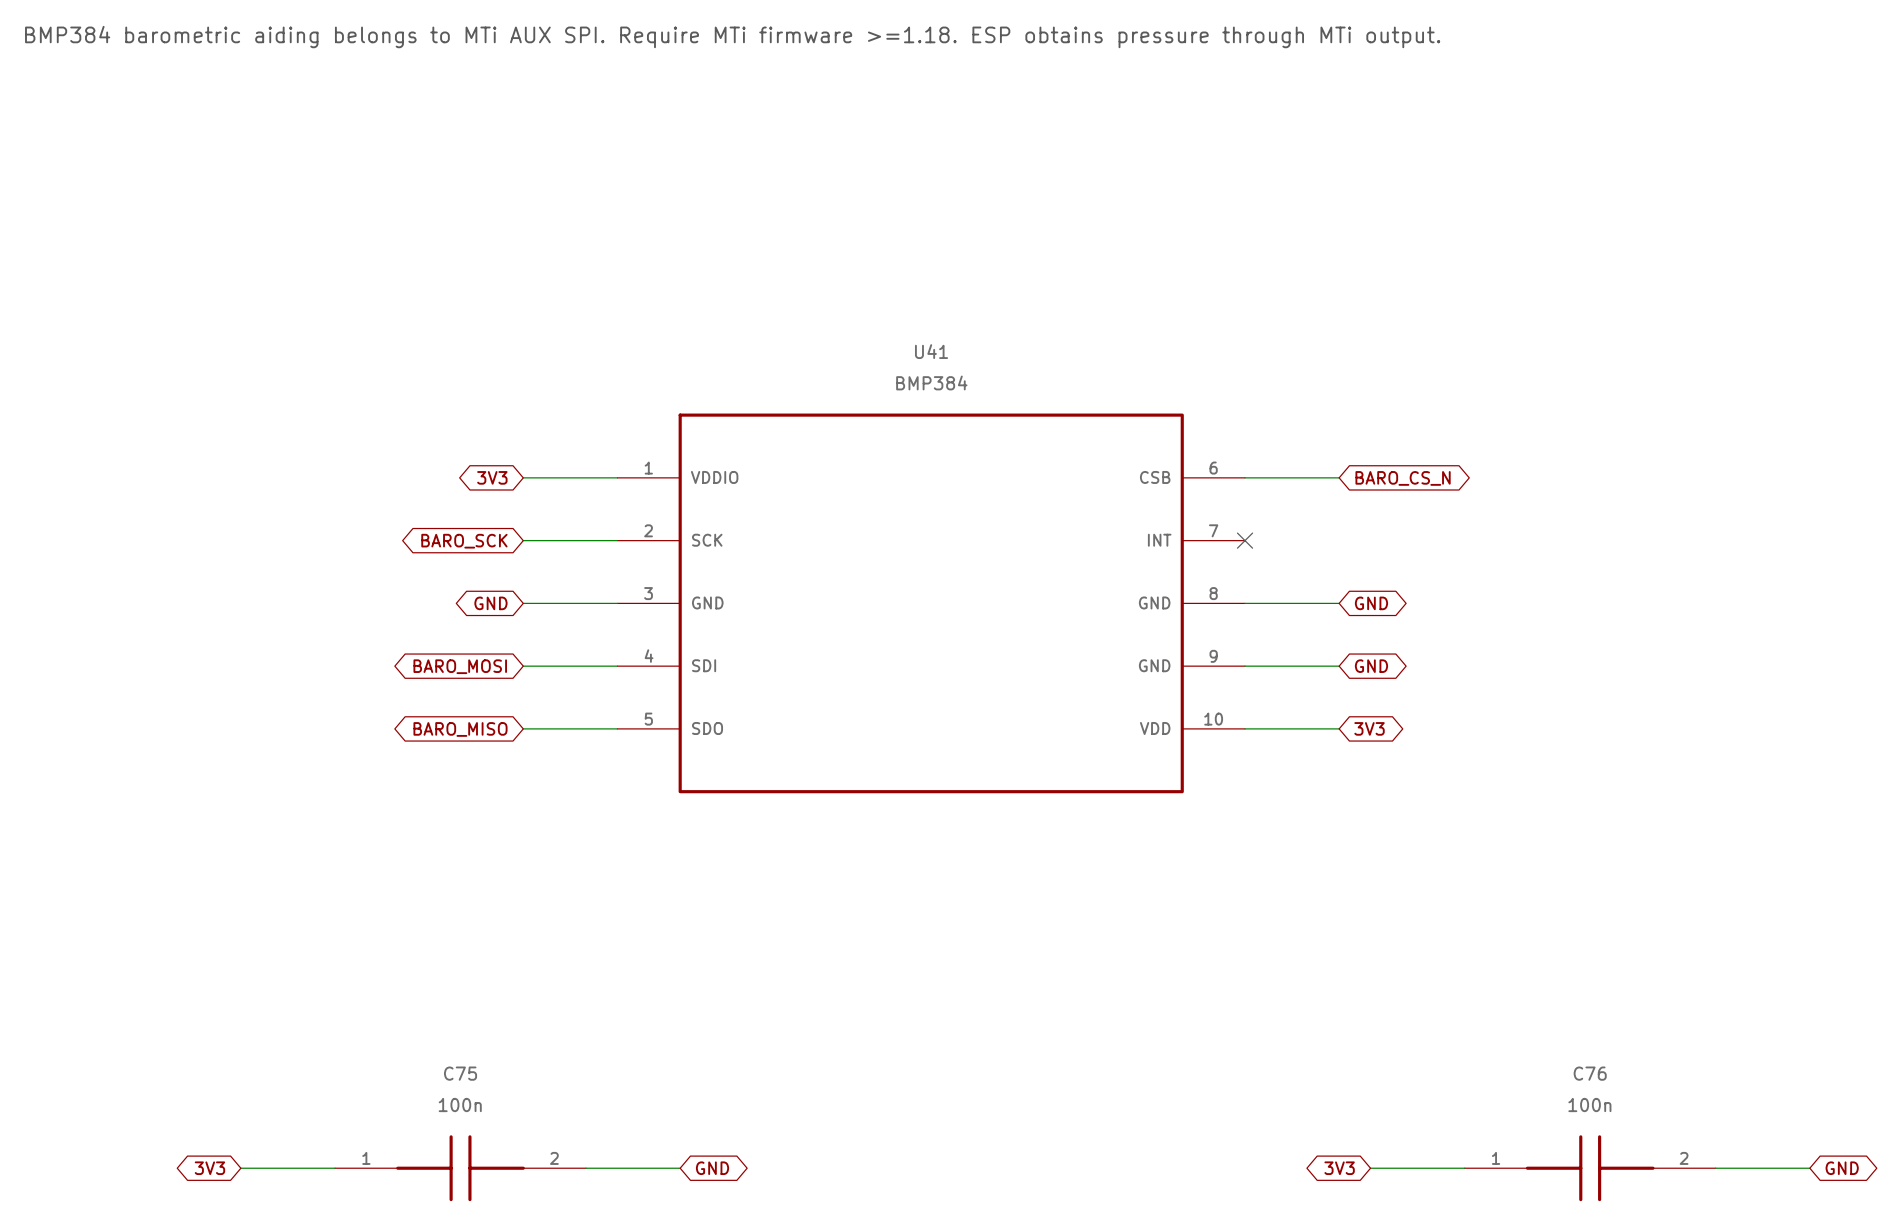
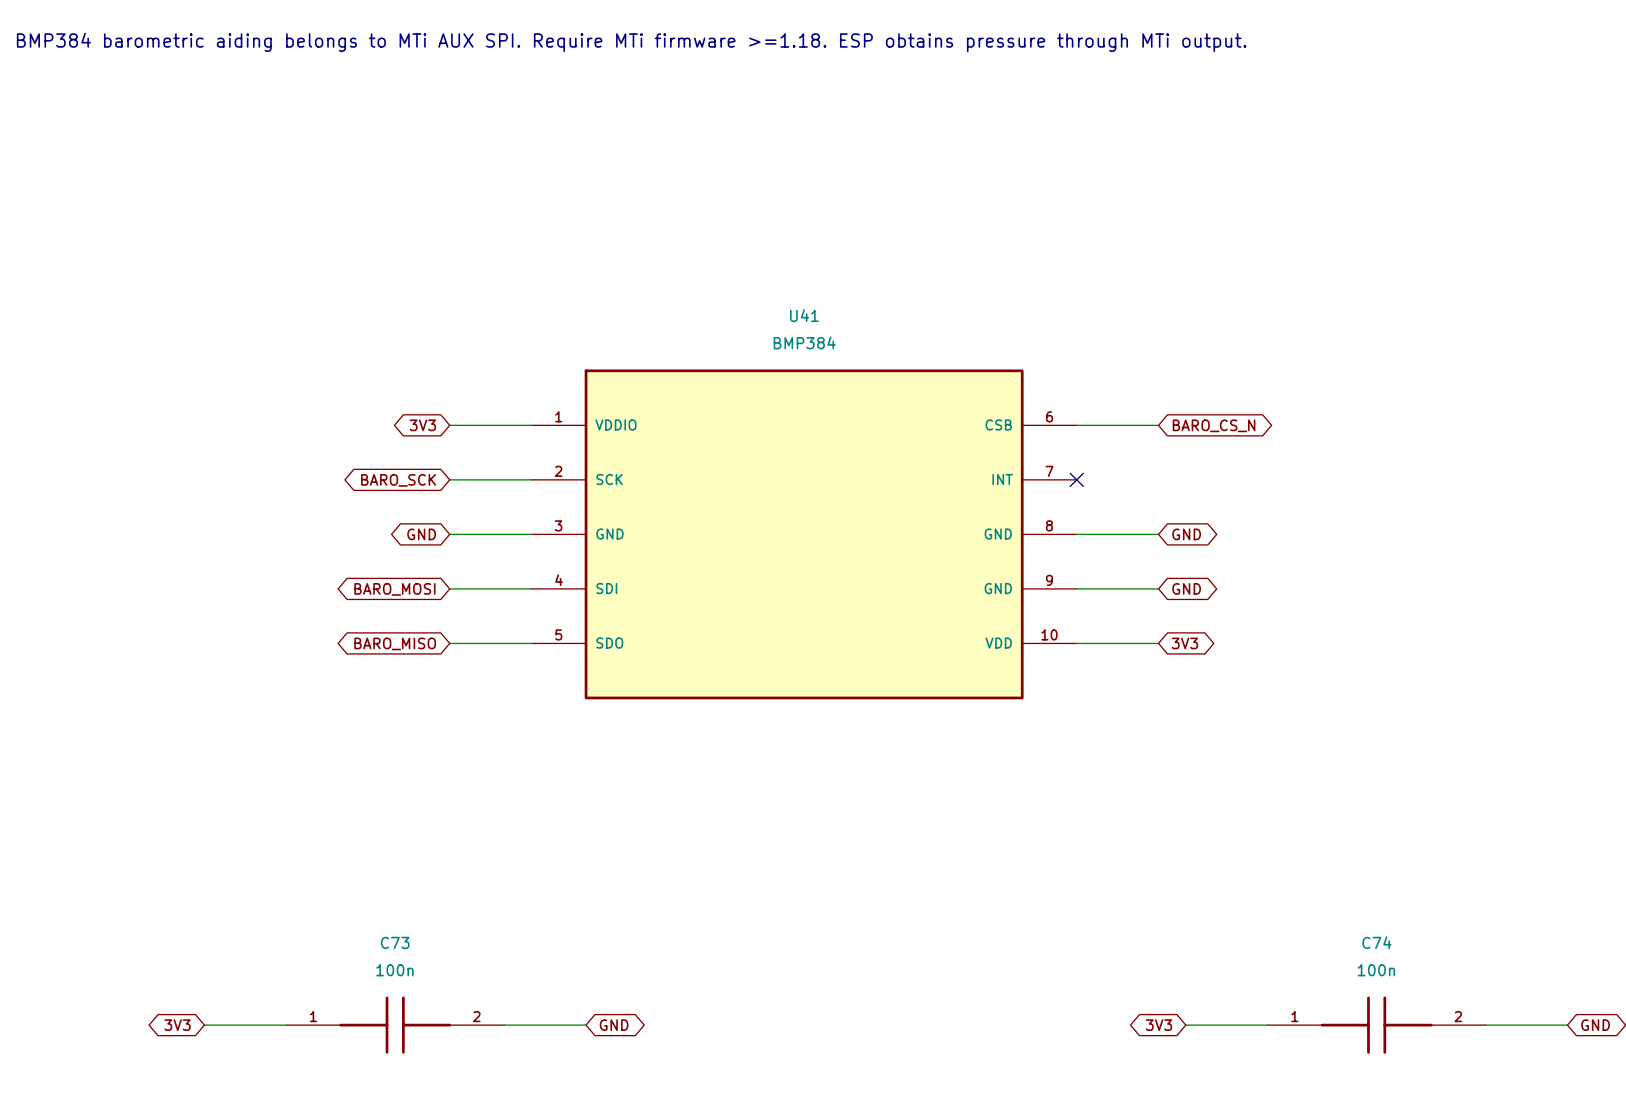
C75 name: C75 (460, 1073) -> C73 (395, 942)
C76 name: C76 (1590, 1073) -> C74 (1376, 942)

